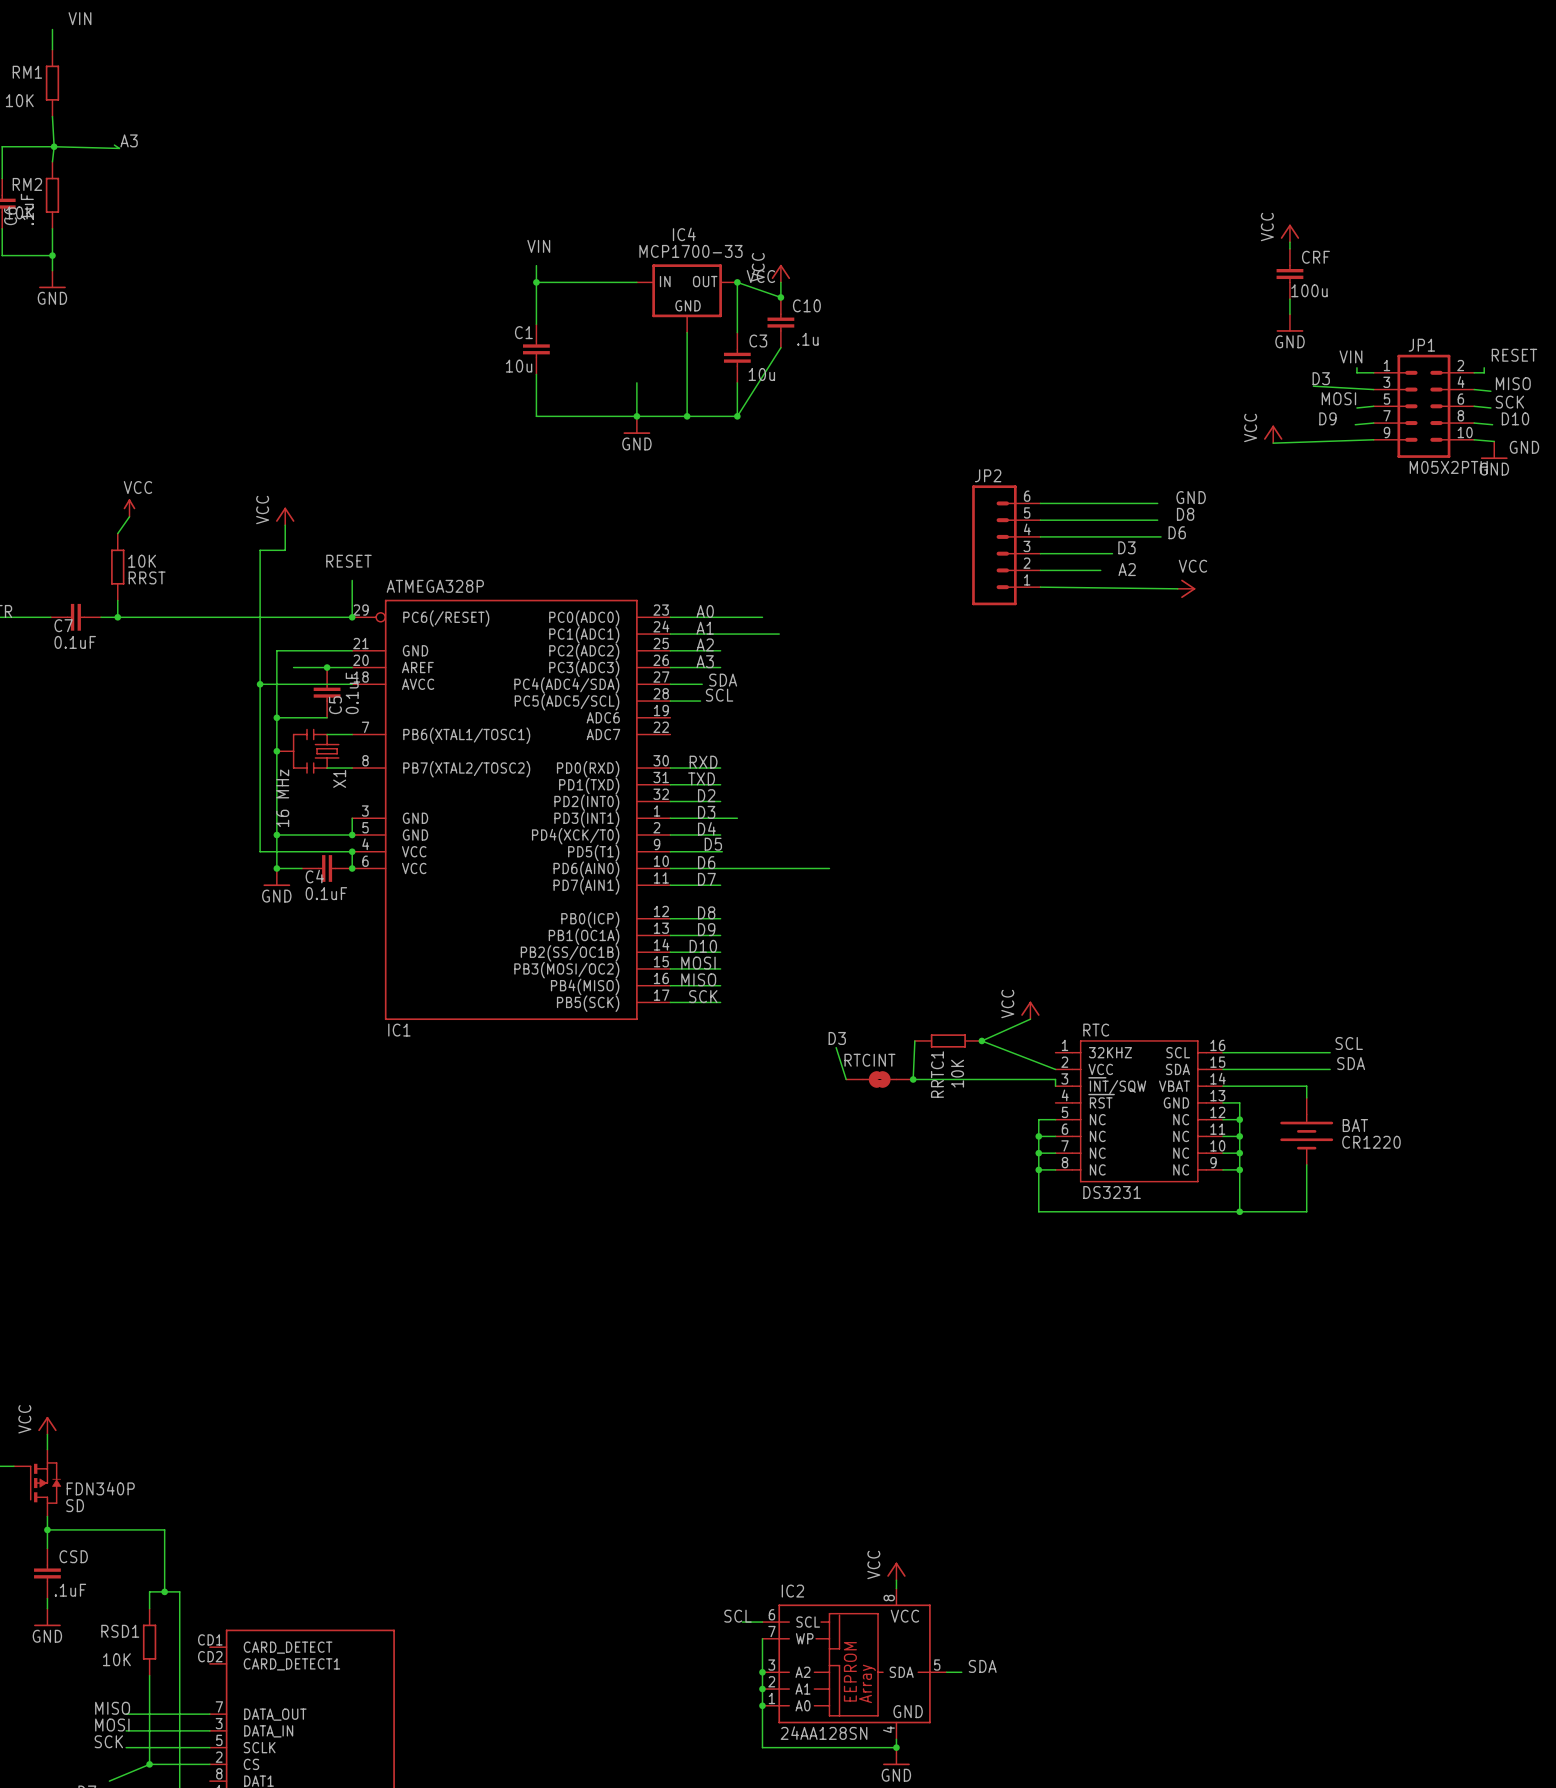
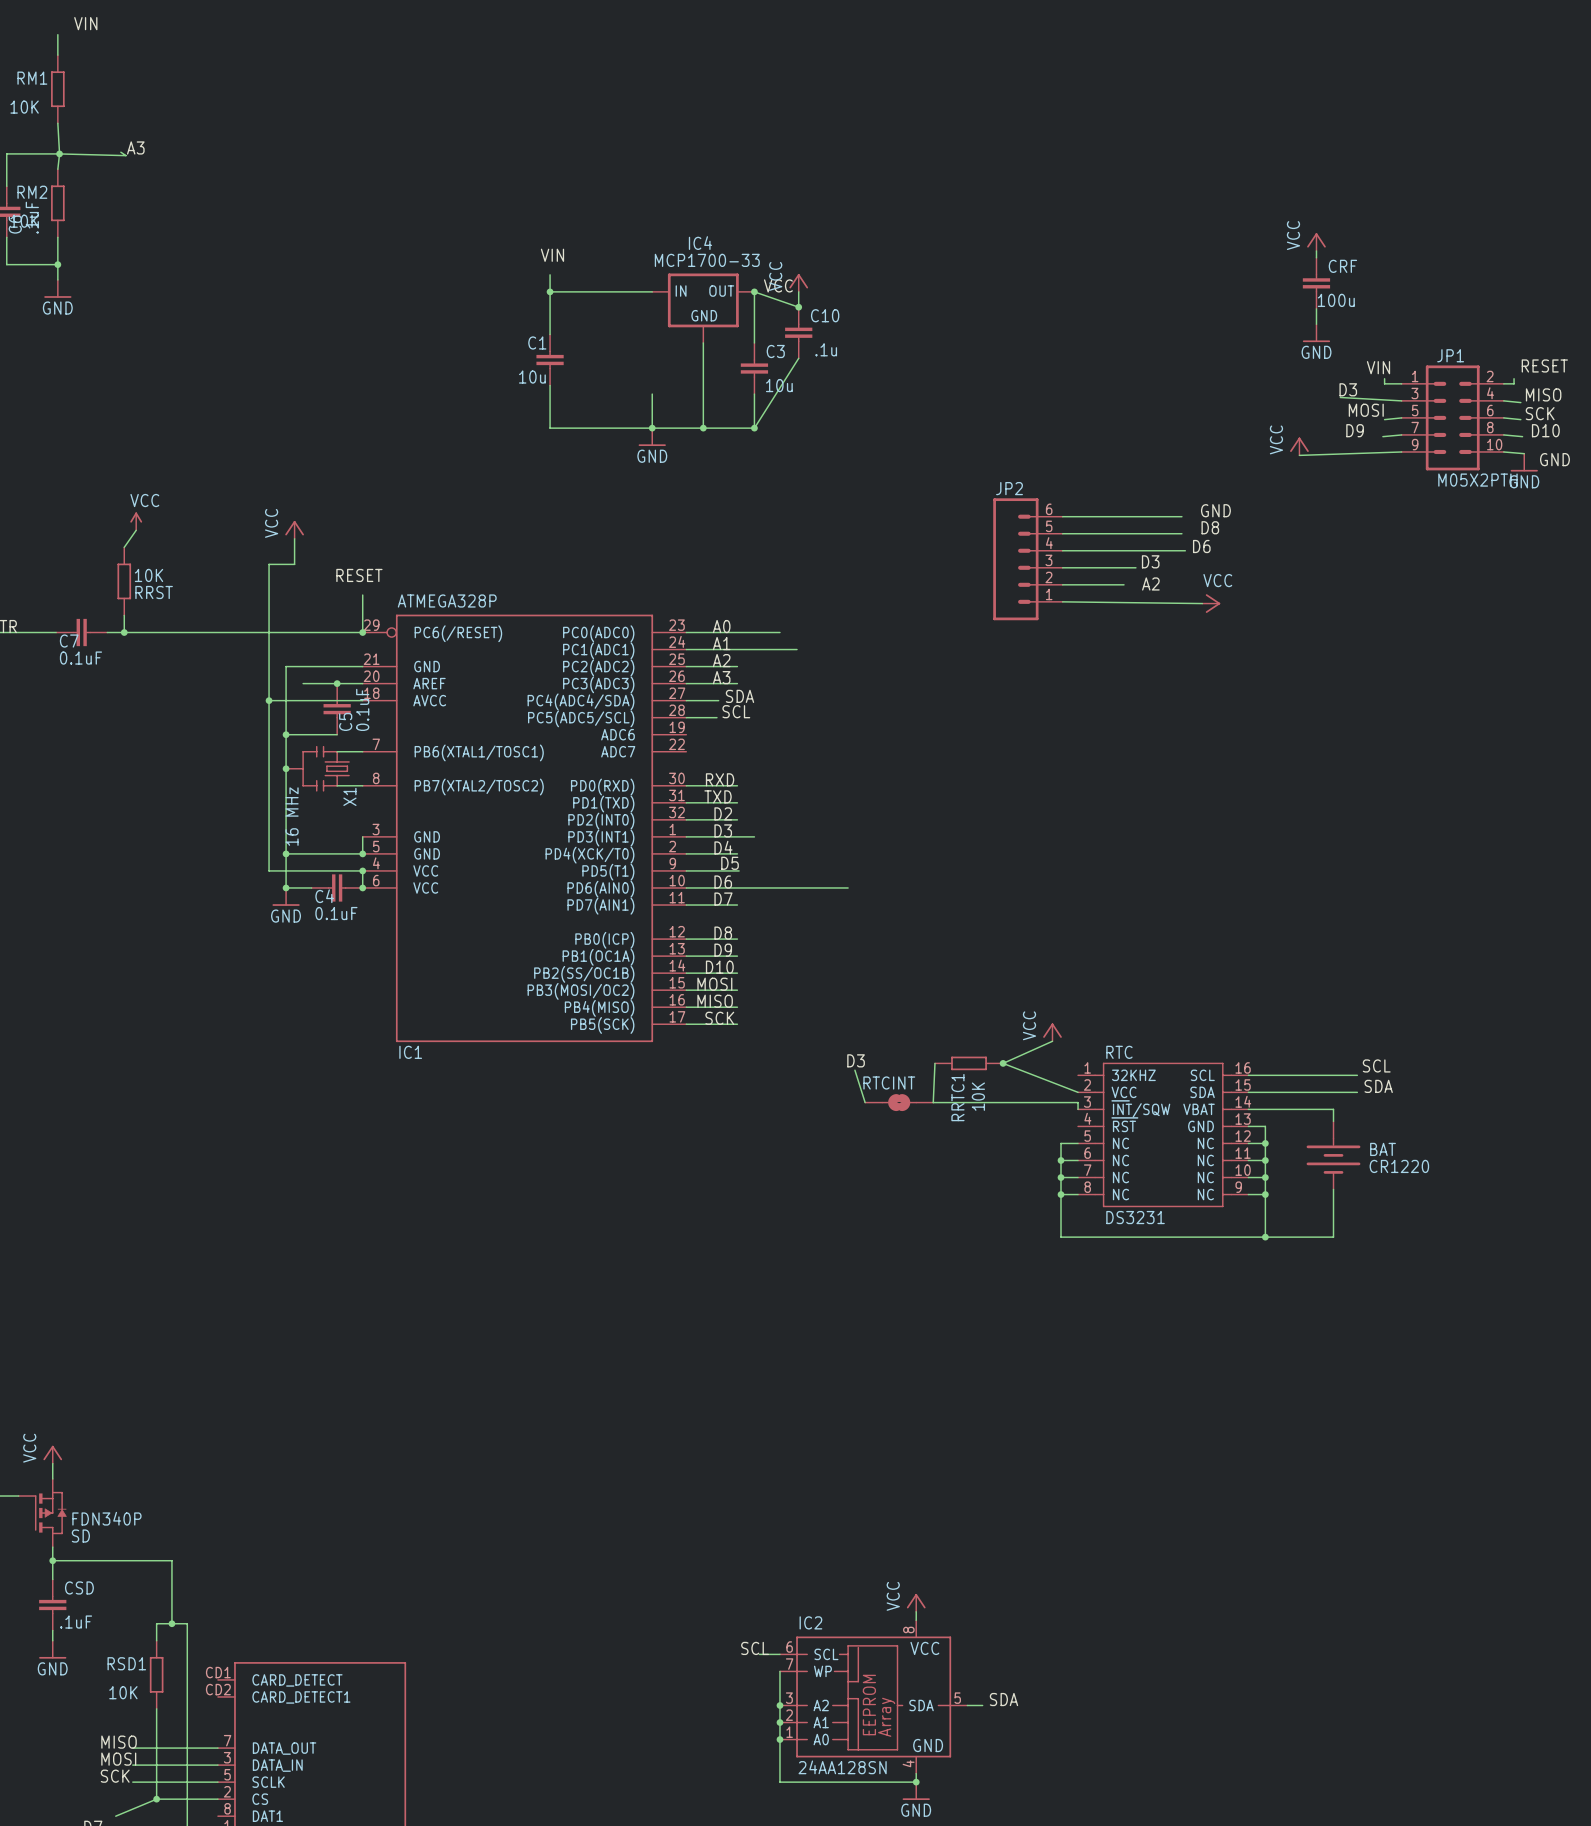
junction: (913, 1079) -> none

